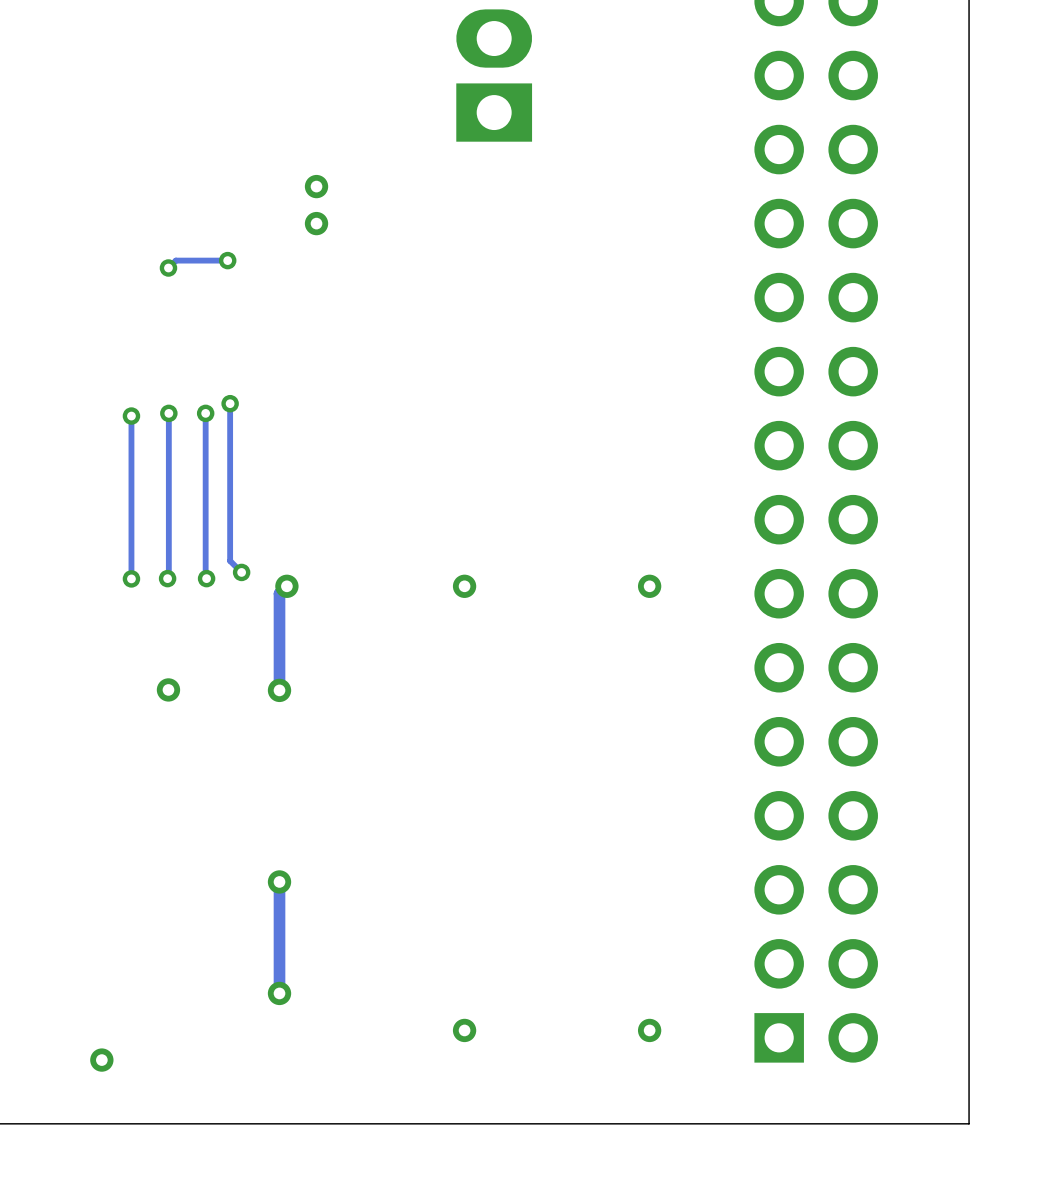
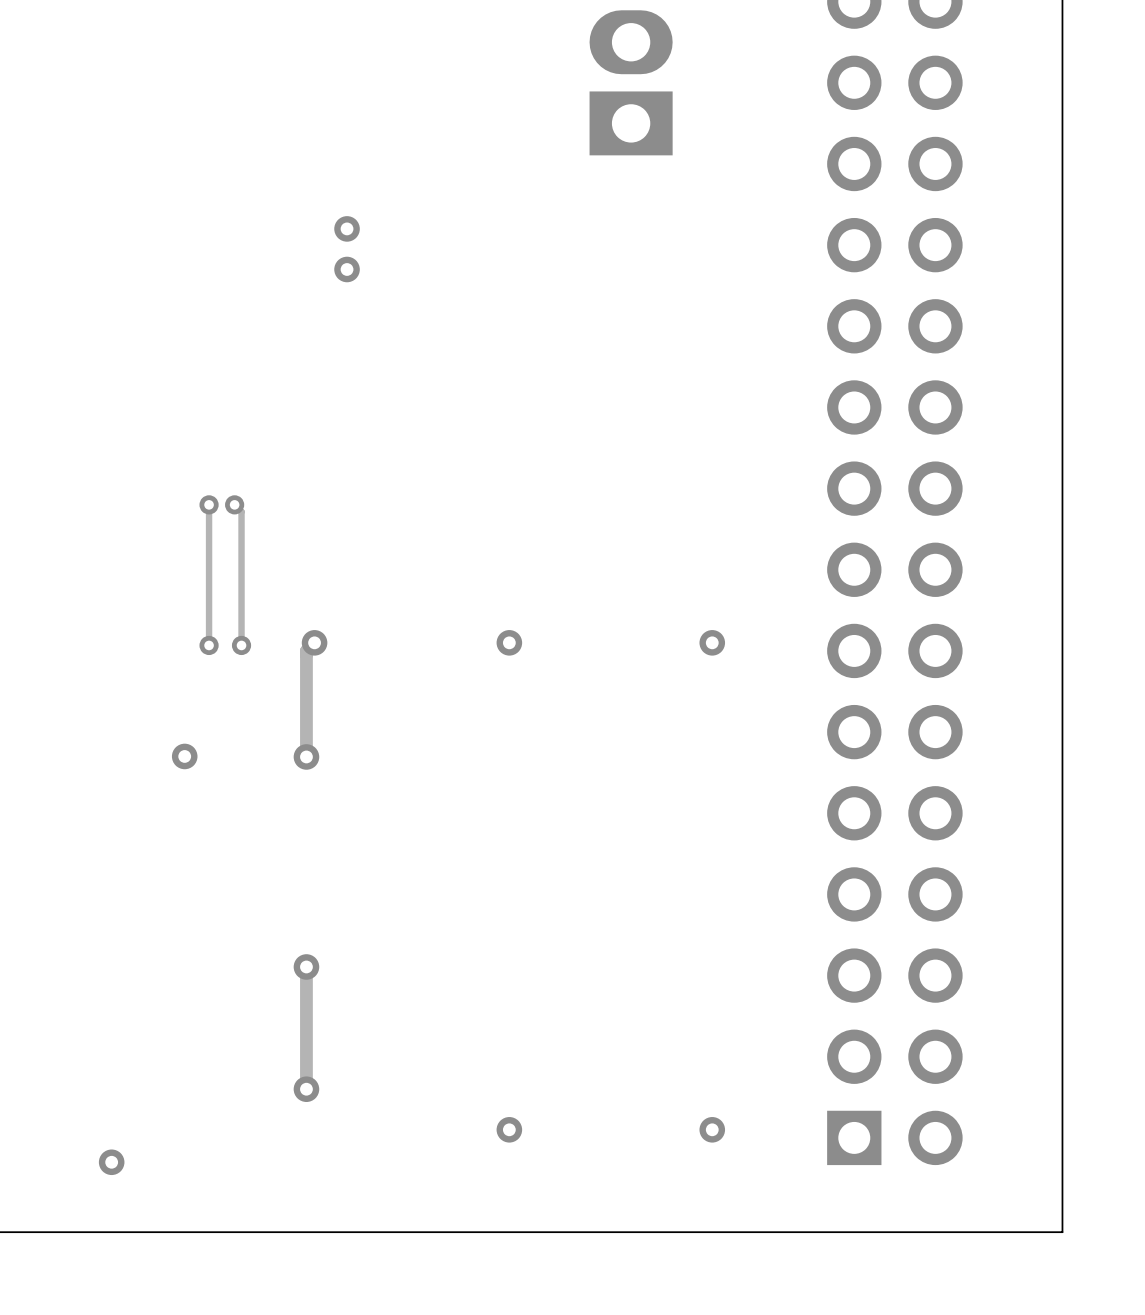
part position: (494, 75) -> (631, 82)
via: (316, 186) -> none
via: none -> (347, 228)
via: (316, 223) -> none
via: none -> (347, 269)
track: (227, 260) (175, 260) (168, 268) -> none
via: (227, 260) -> none
via: (168, 268) -> none
track: (230, 403) (230, 560) (241, 572) -> none
via: (230, 403) -> none
track: (168, 413) (167, 578) -> none
via: (168, 413) -> none
track: (205, 413) (206, 578) -> none
via: (205, 413) -> none
track: (131, 416) (131, 578) -> none
via: (131, 416) -> none
track: none -> (209, 504) (209, 645)
via: none -> (209, 504)
track: none -> (234, 504) (241, 511) (241, 645)
via: none -> (234, 504)
via: (241, 572) -> none
via: (131, 578) -> none
via: (167, 578) -> none
via: (206, 578) -> none
via: none -> (209, 645)
via: none -> (241, 645)

